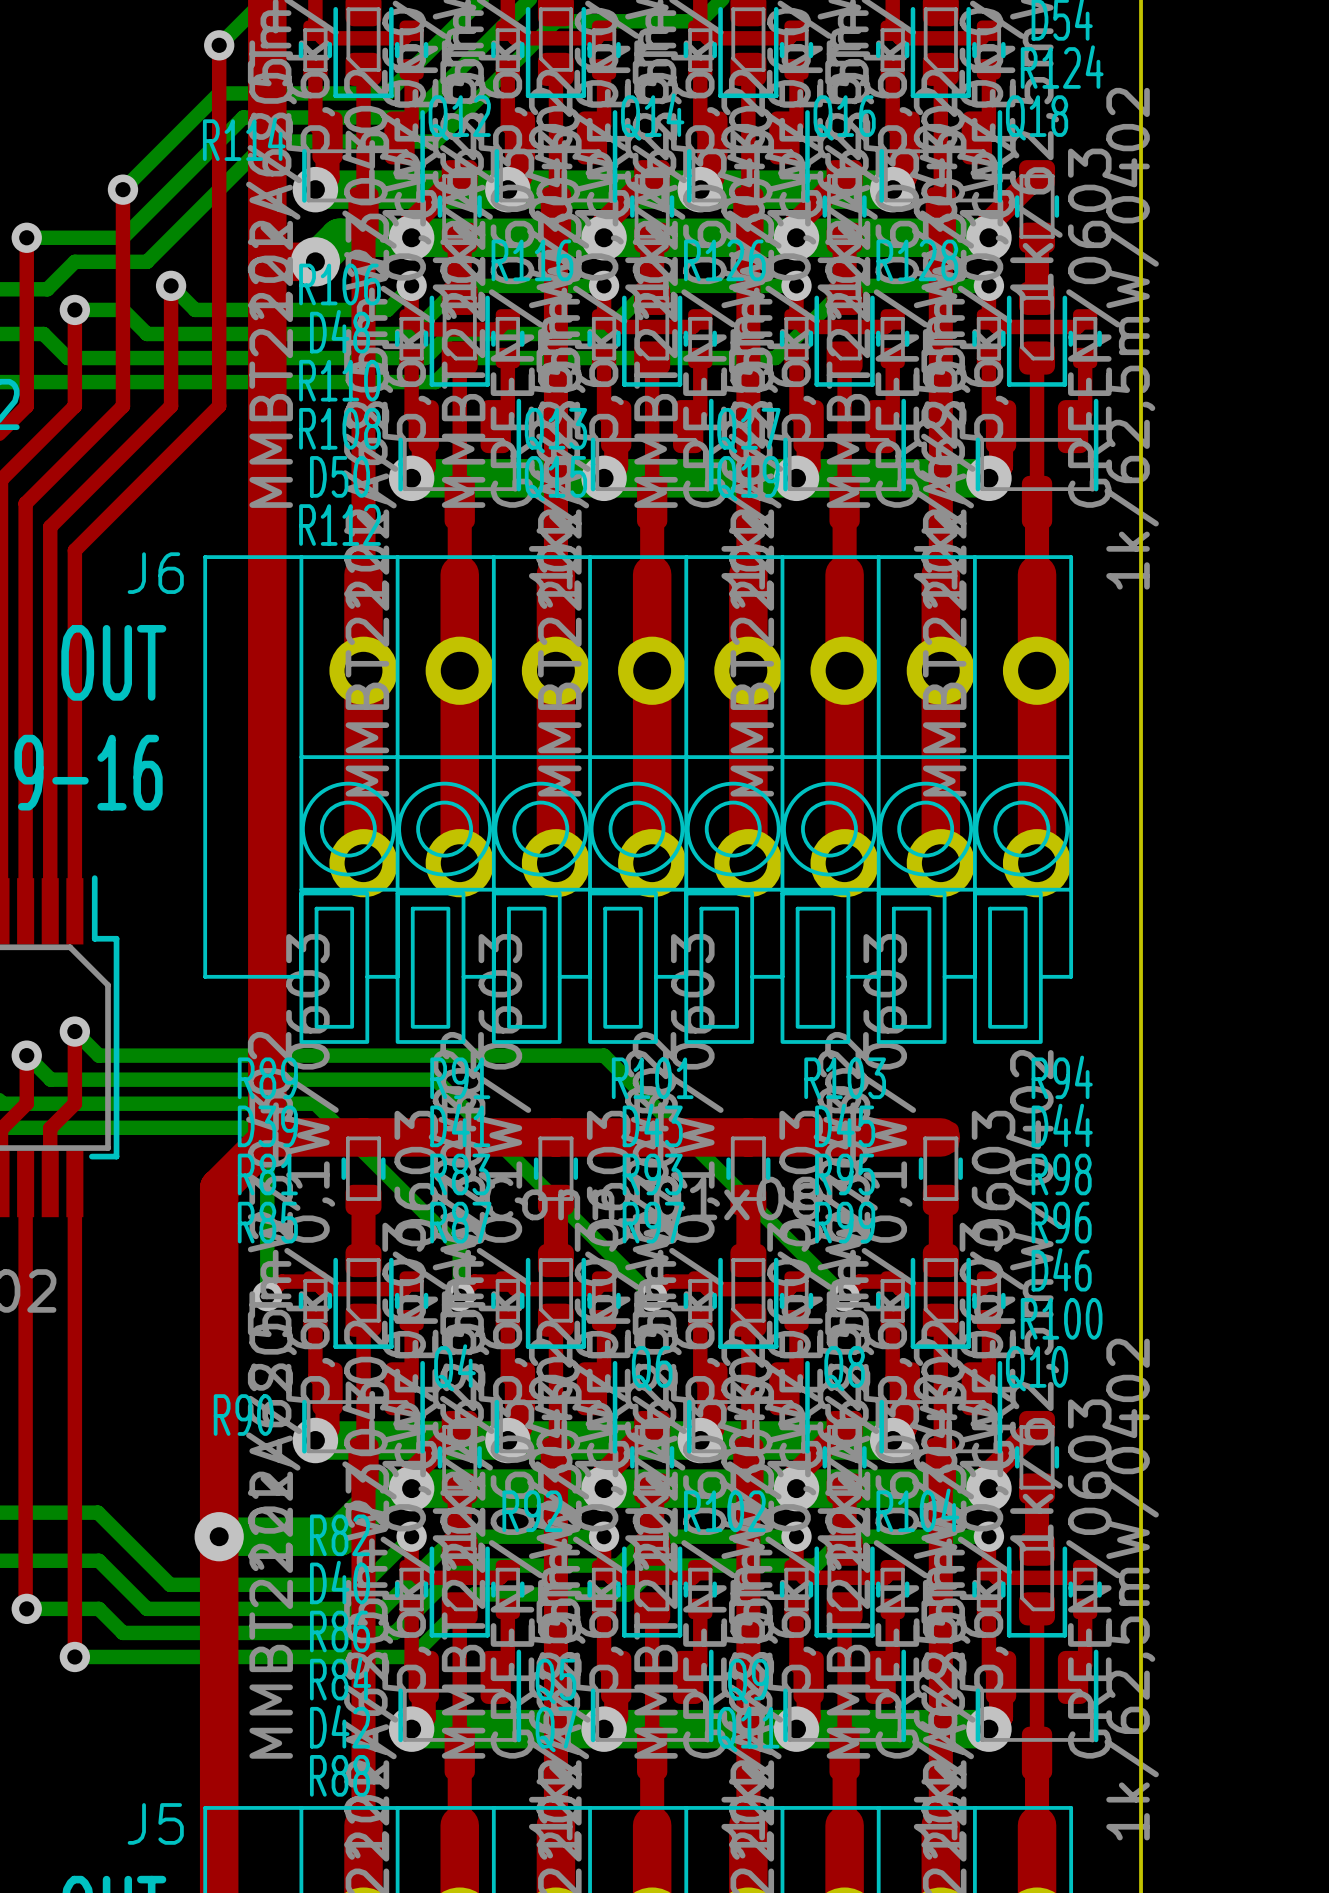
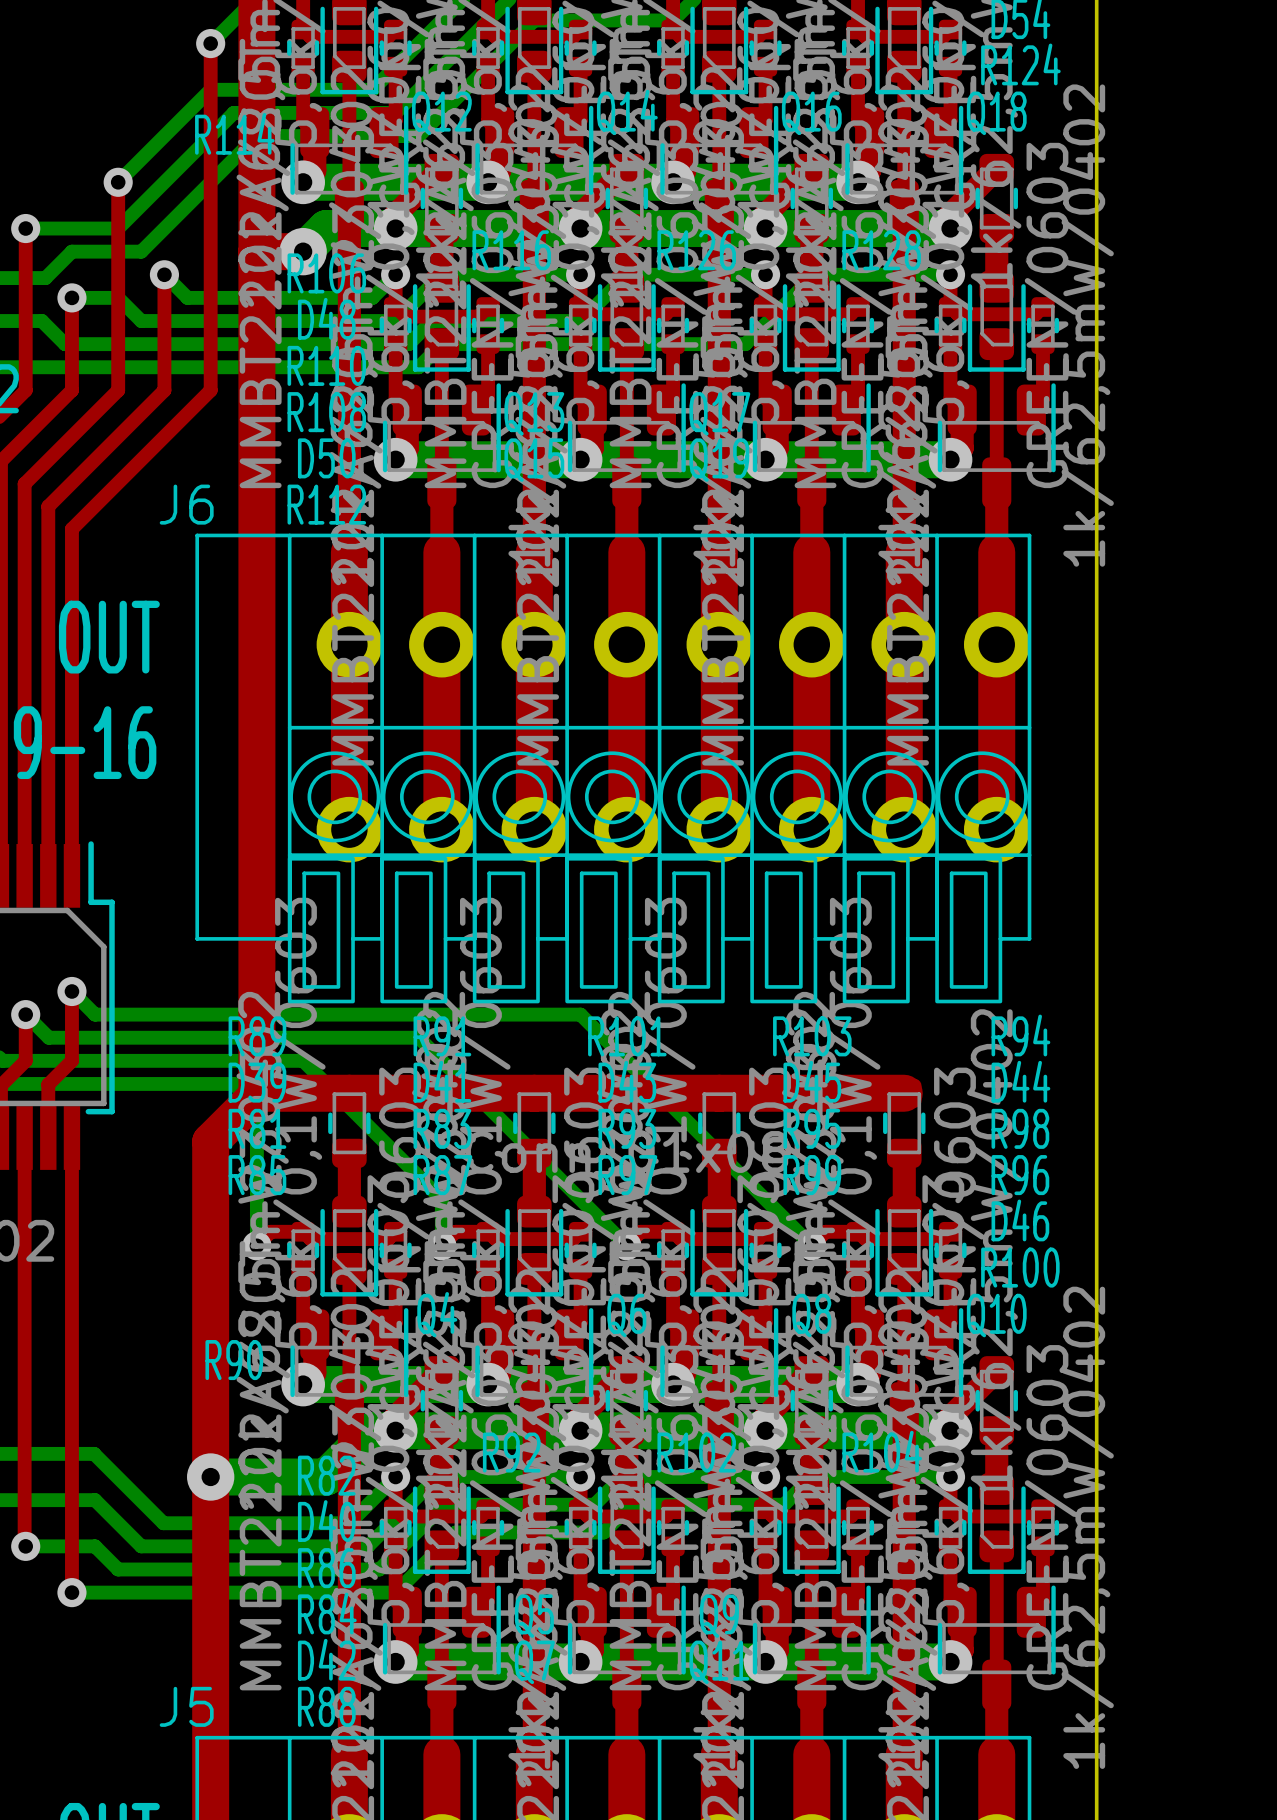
J6 name position: J6 (155, 573) -> J6 (186, 504)
J5 name position: J5 (155, 1823) -> J5 (186, 1706)

